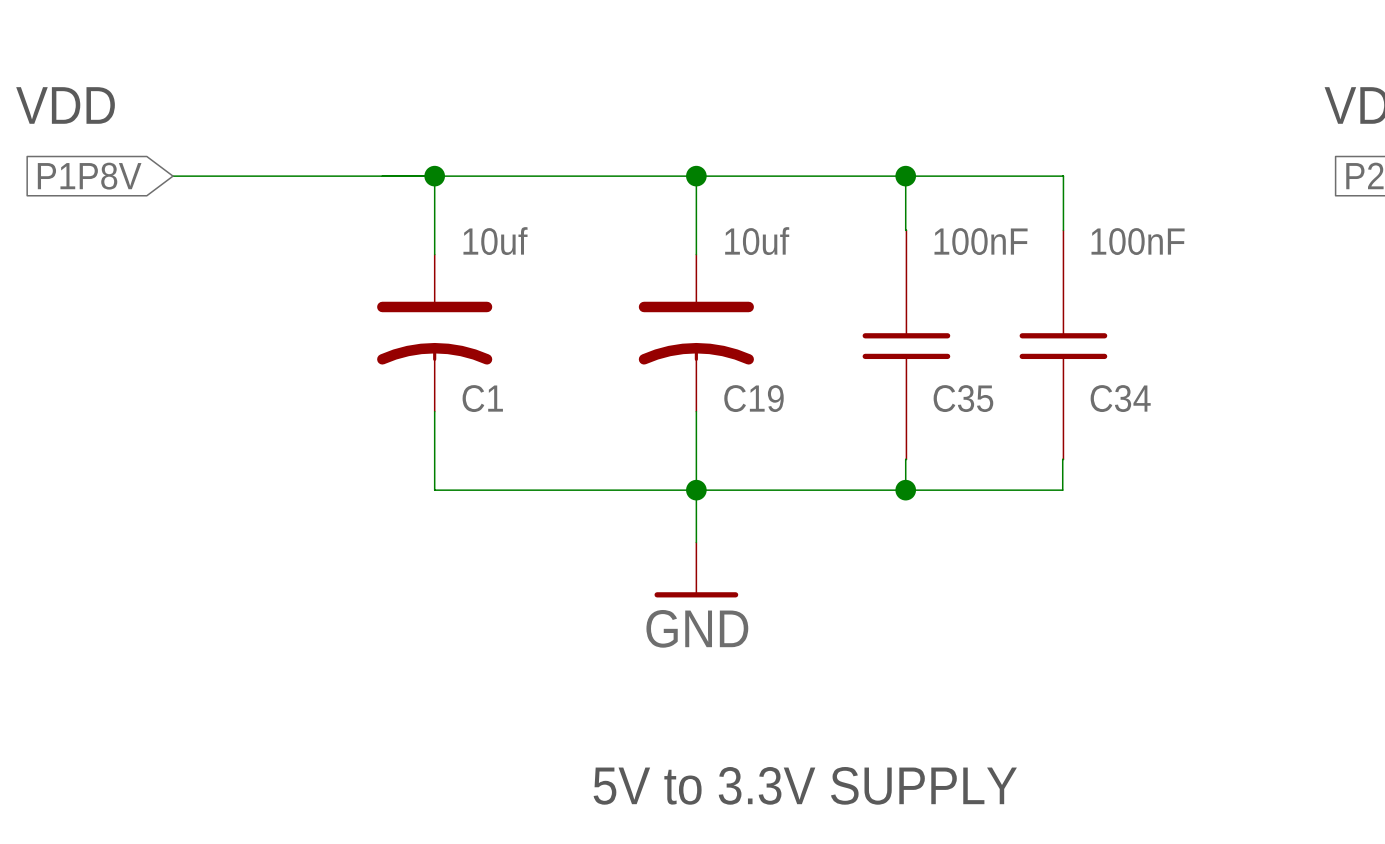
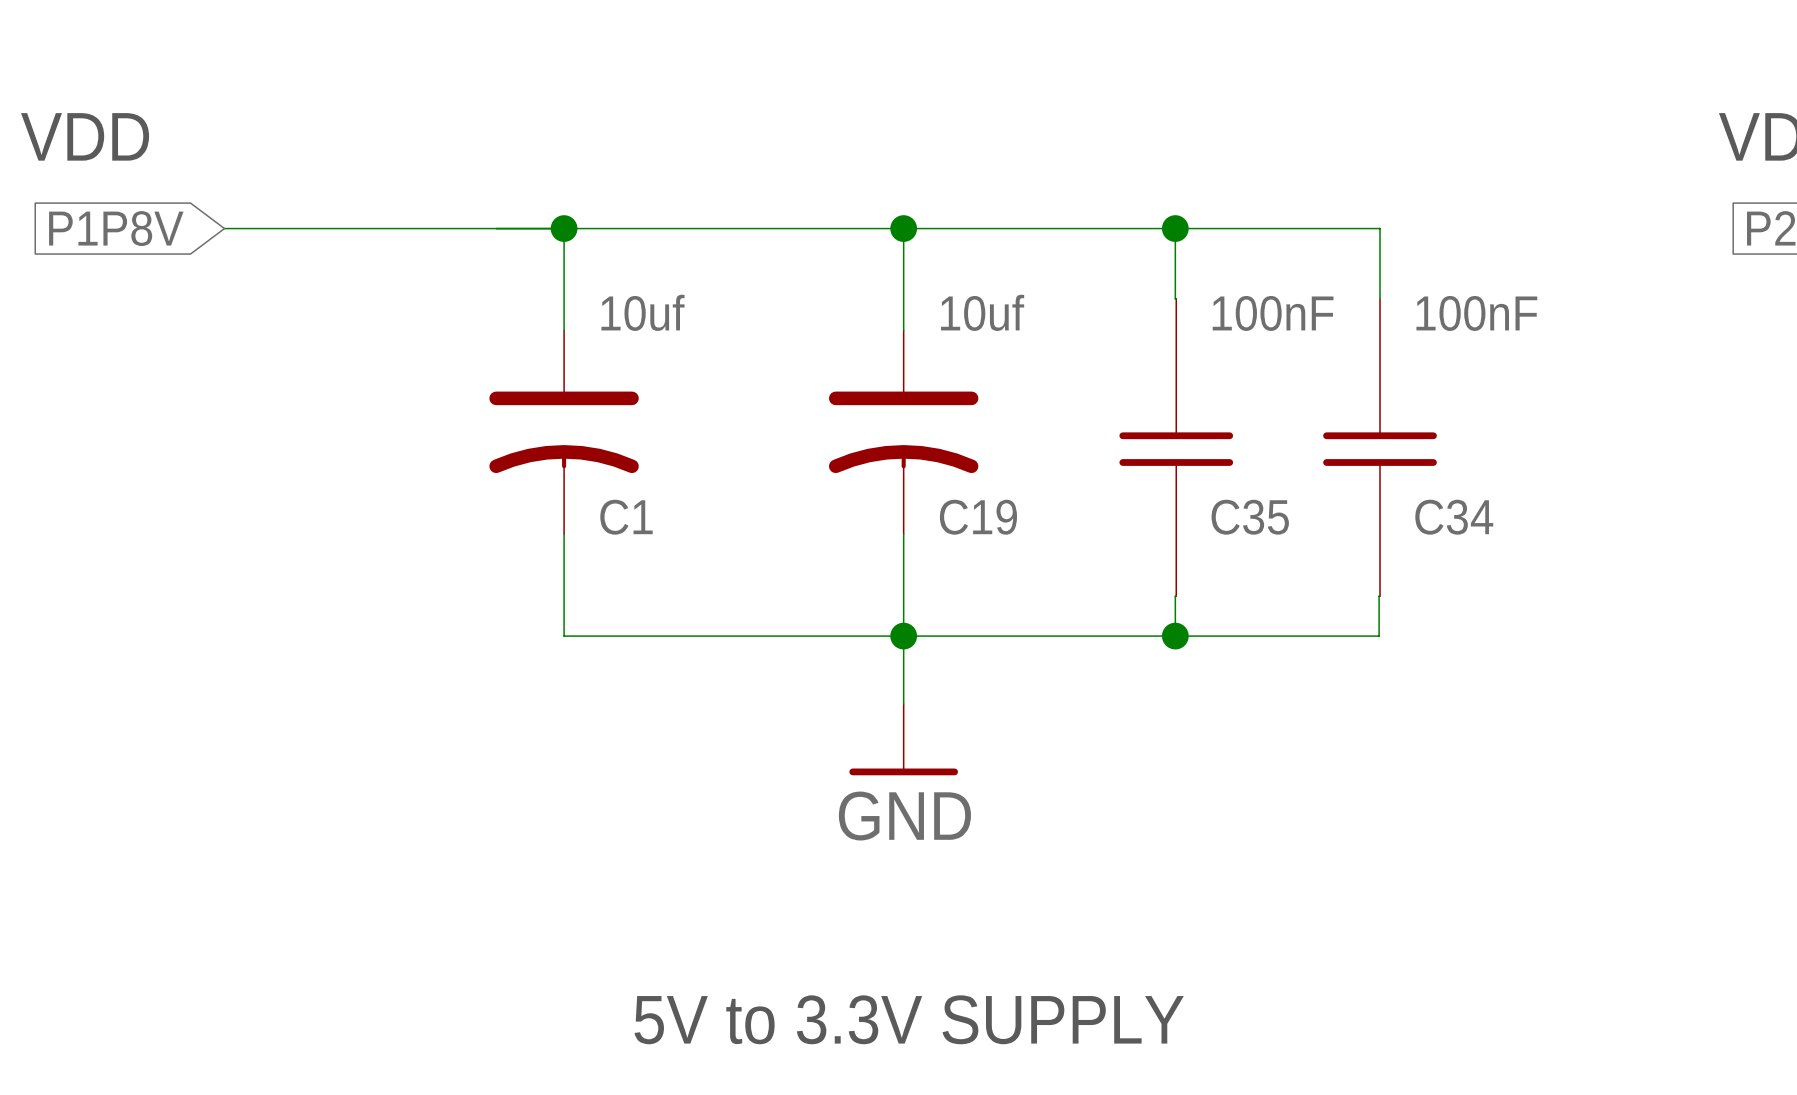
text position: 5V to 3.3V SUPPLY (805, 785) -> 5V to 3.3V SUPPLY (909, 1019)

